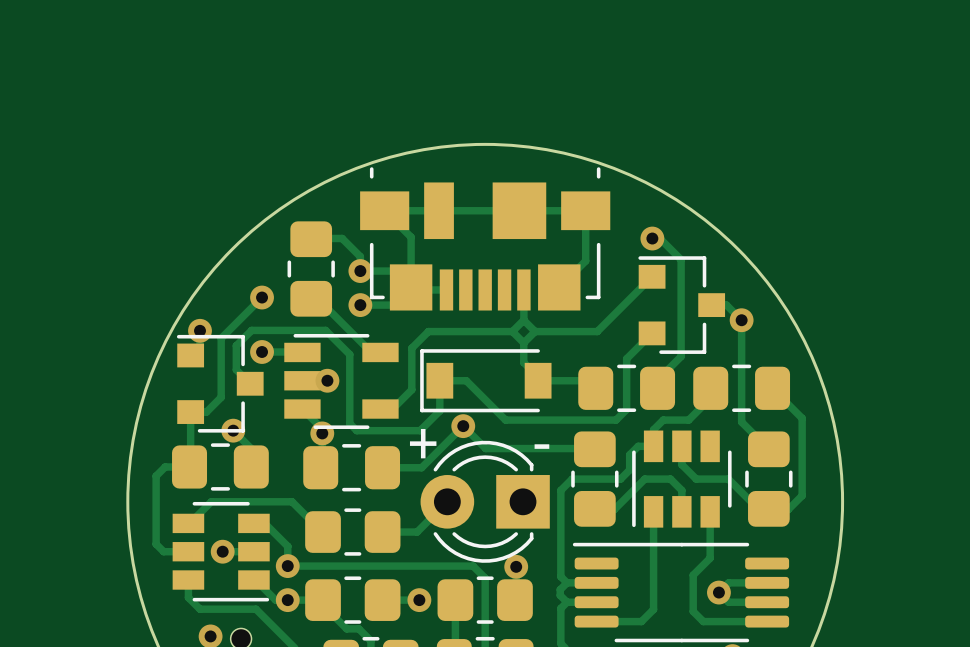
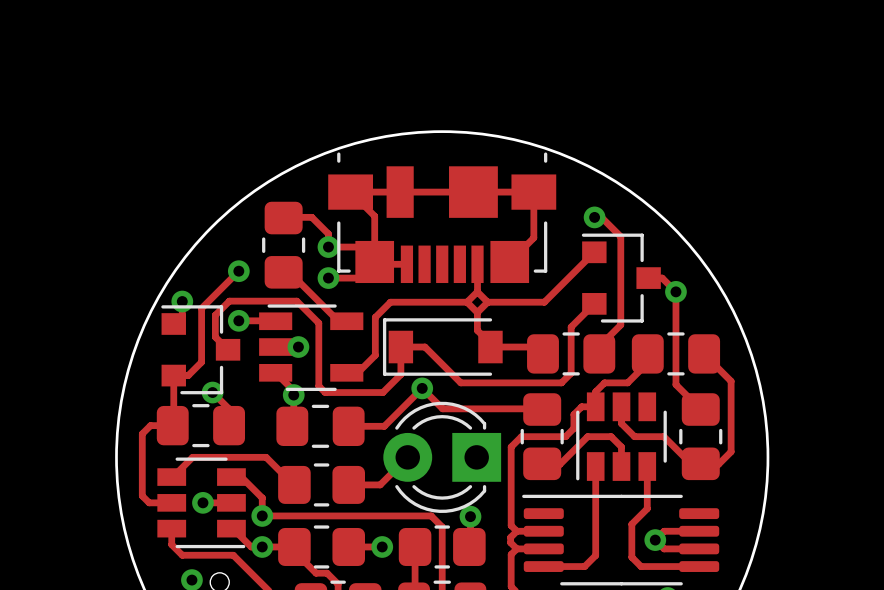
text: + (423, 443) -> none
text: - (541, 446) -> none

